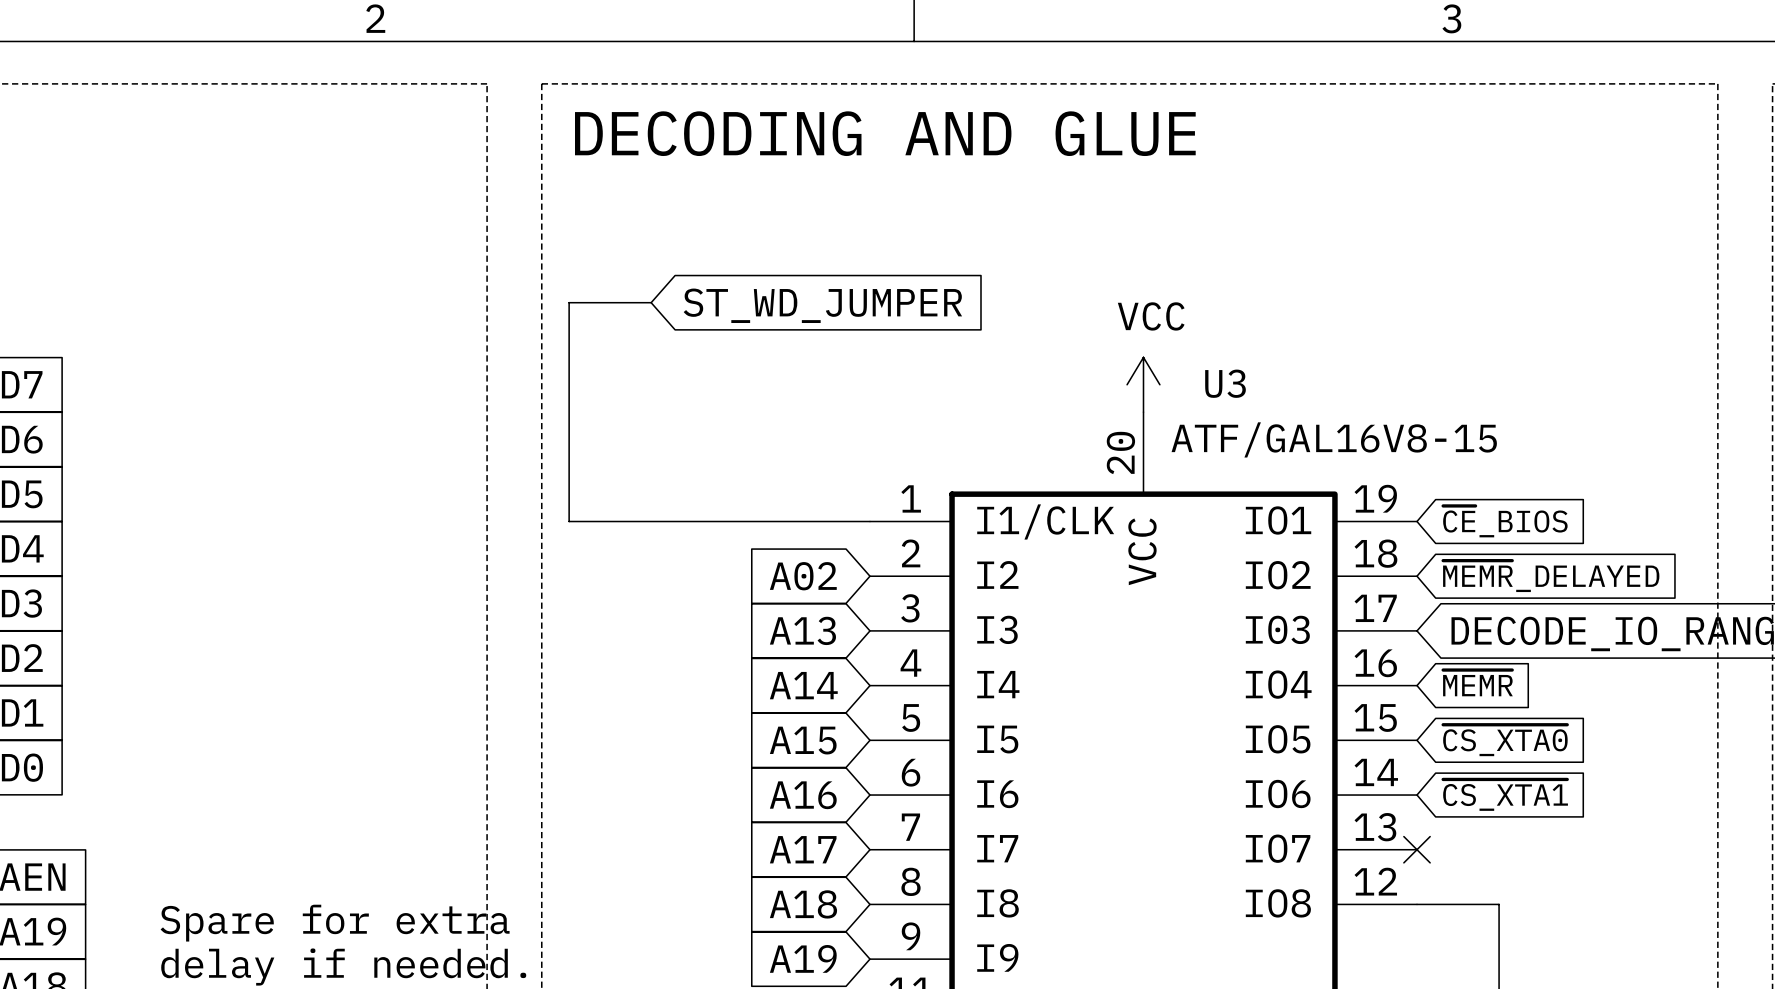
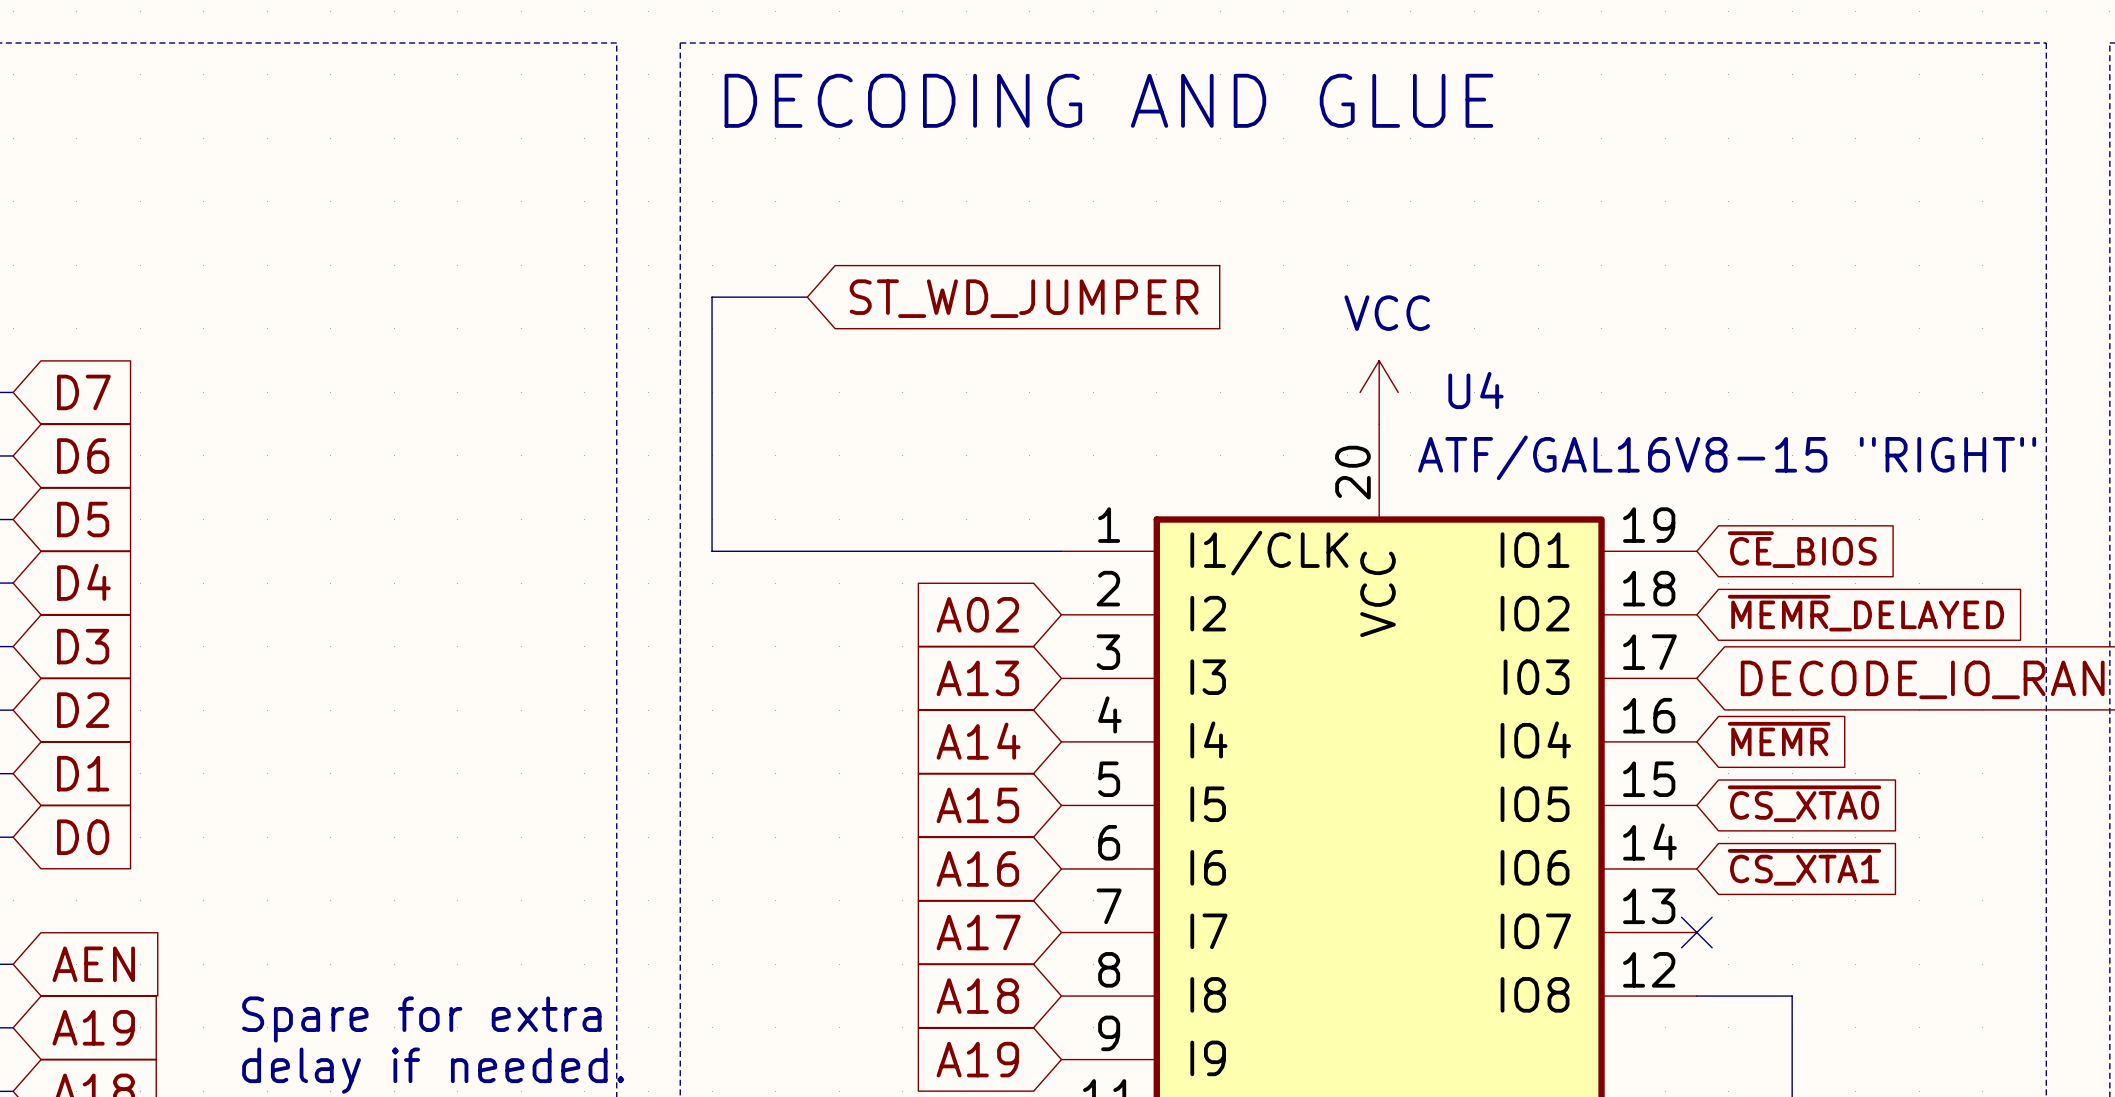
U3 name: U3 (1225, 383) -> U4 (1475, 390)
U3 value: ATF/GAL16V8-15 (1334, 439) -> ATF/GAL16V8-15 "RIGHT" (1727, 457)

